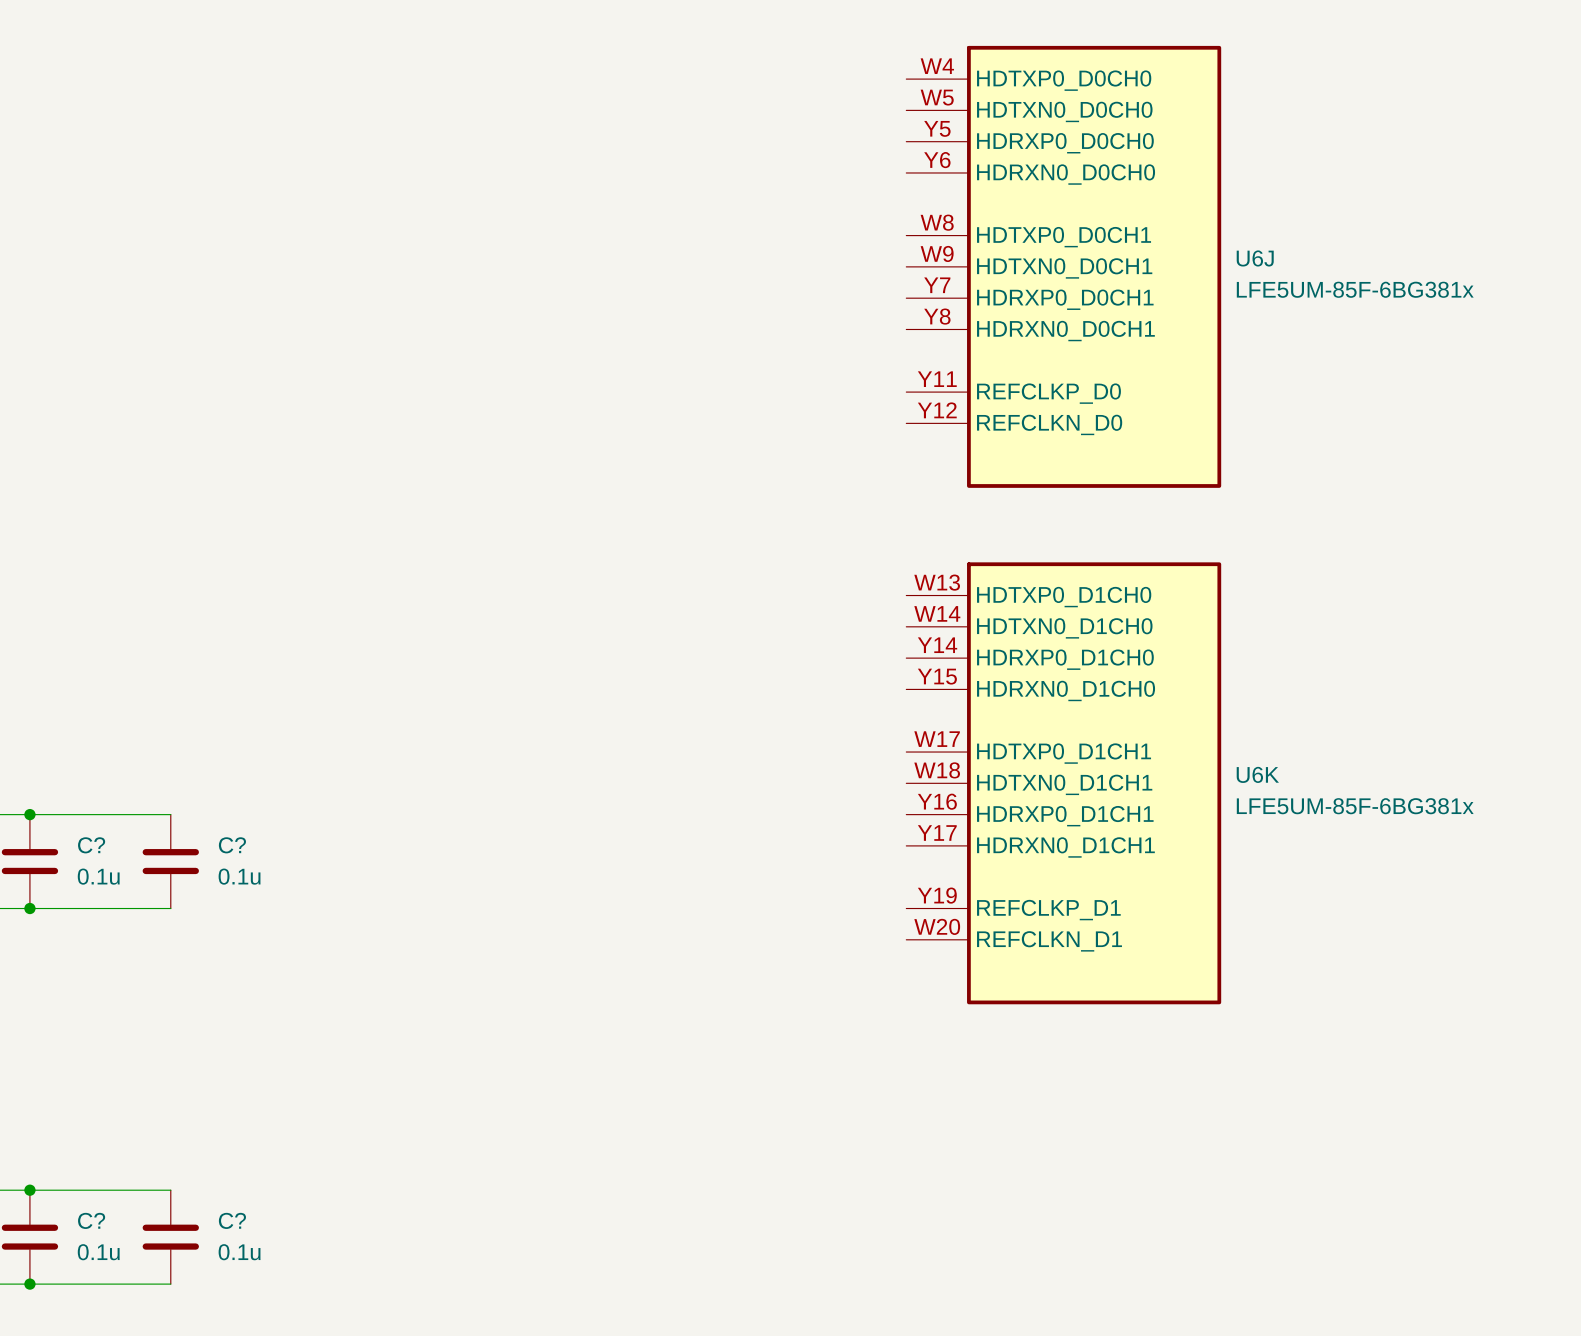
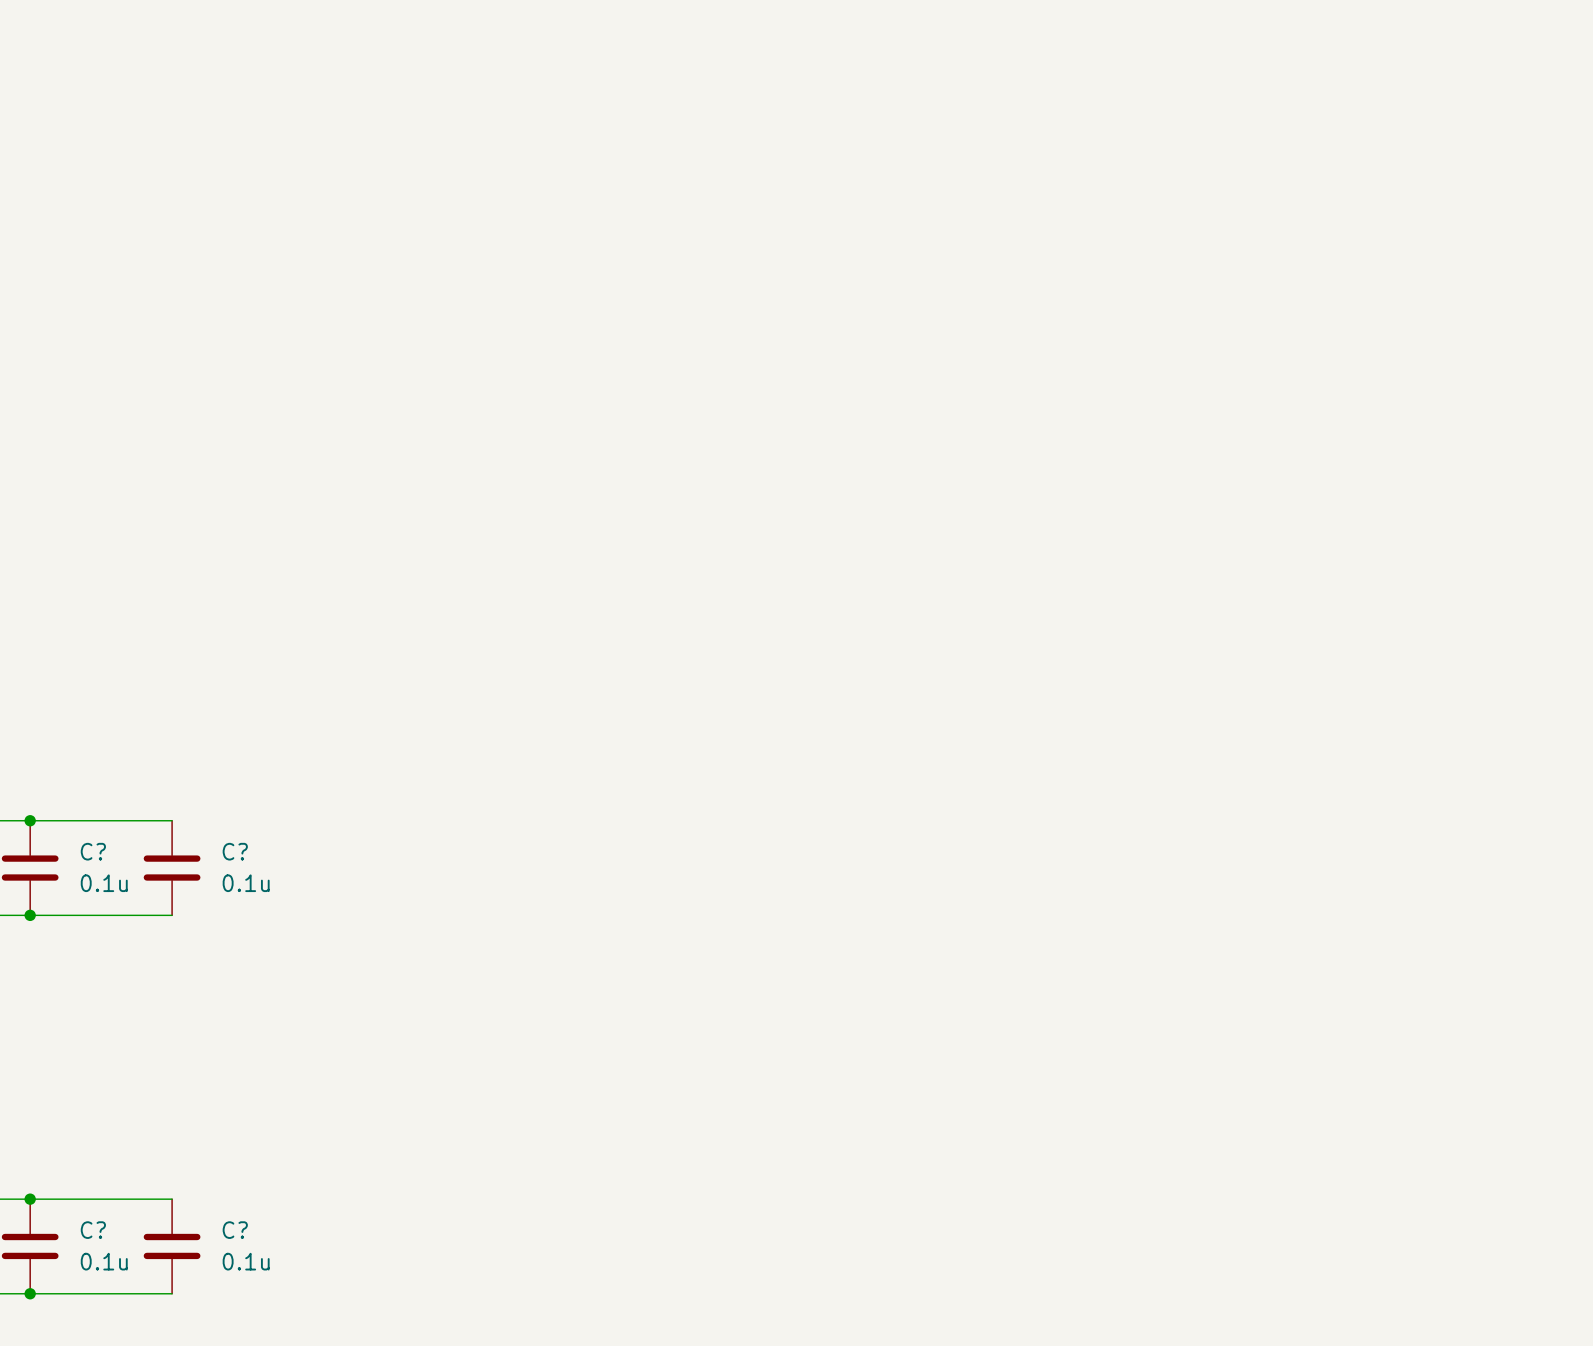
U6J: LFE5UM-85F-6BG381x (1063, 266) -> none
U6K: LFE5UM-85F-6BG381x (1063, 783) -> none

